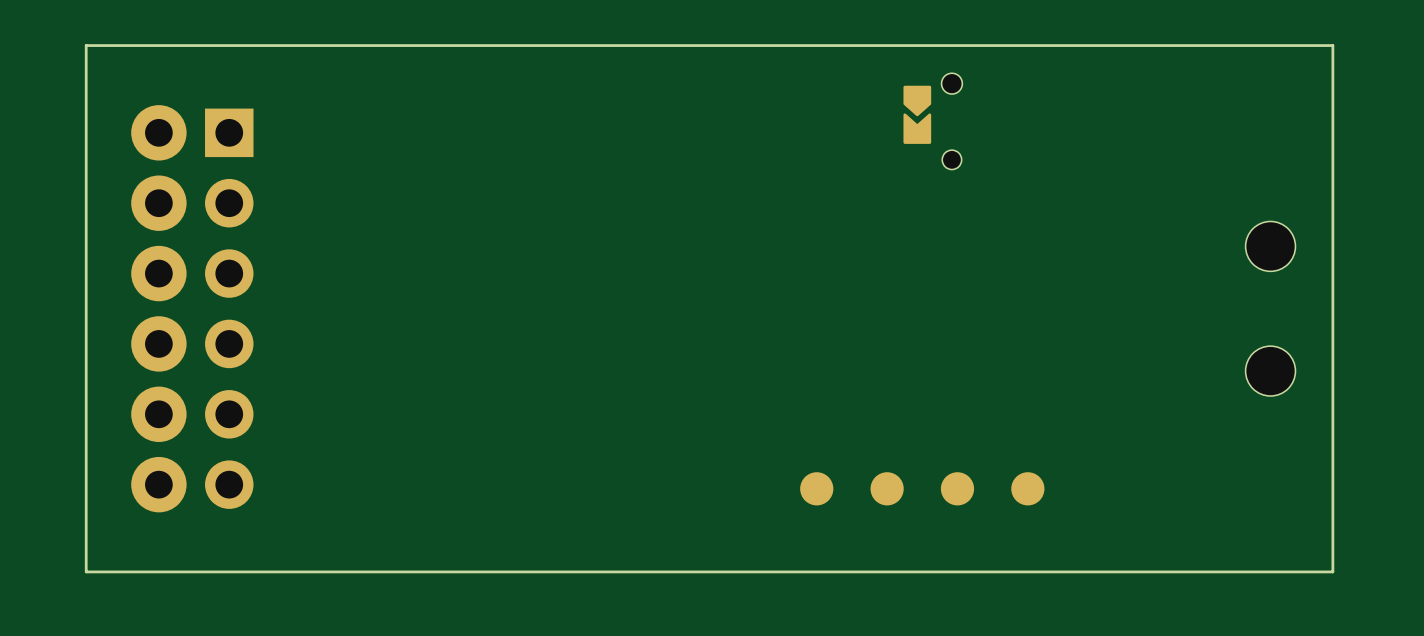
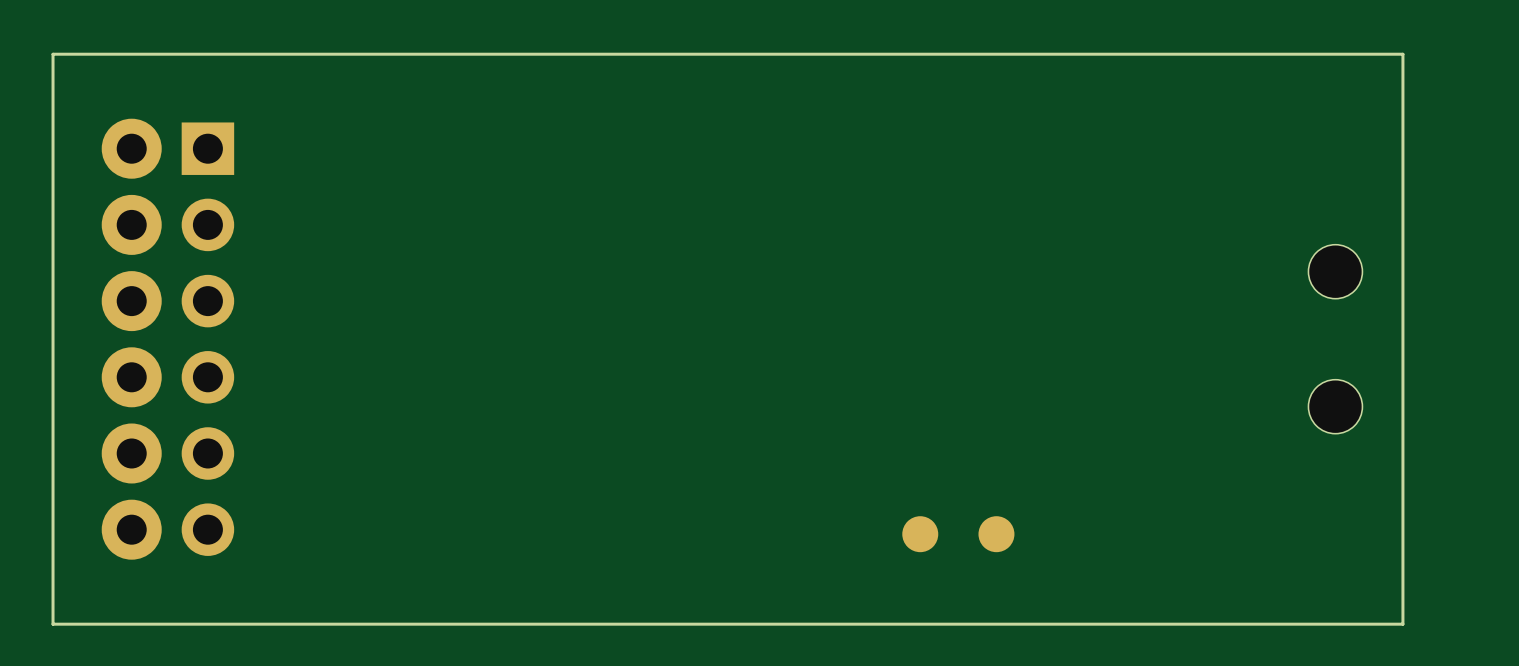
part: (917, 114) -> none
part: (951, 121) -> none
part: (816, 488) -> none
part: (1027, 488) -> none

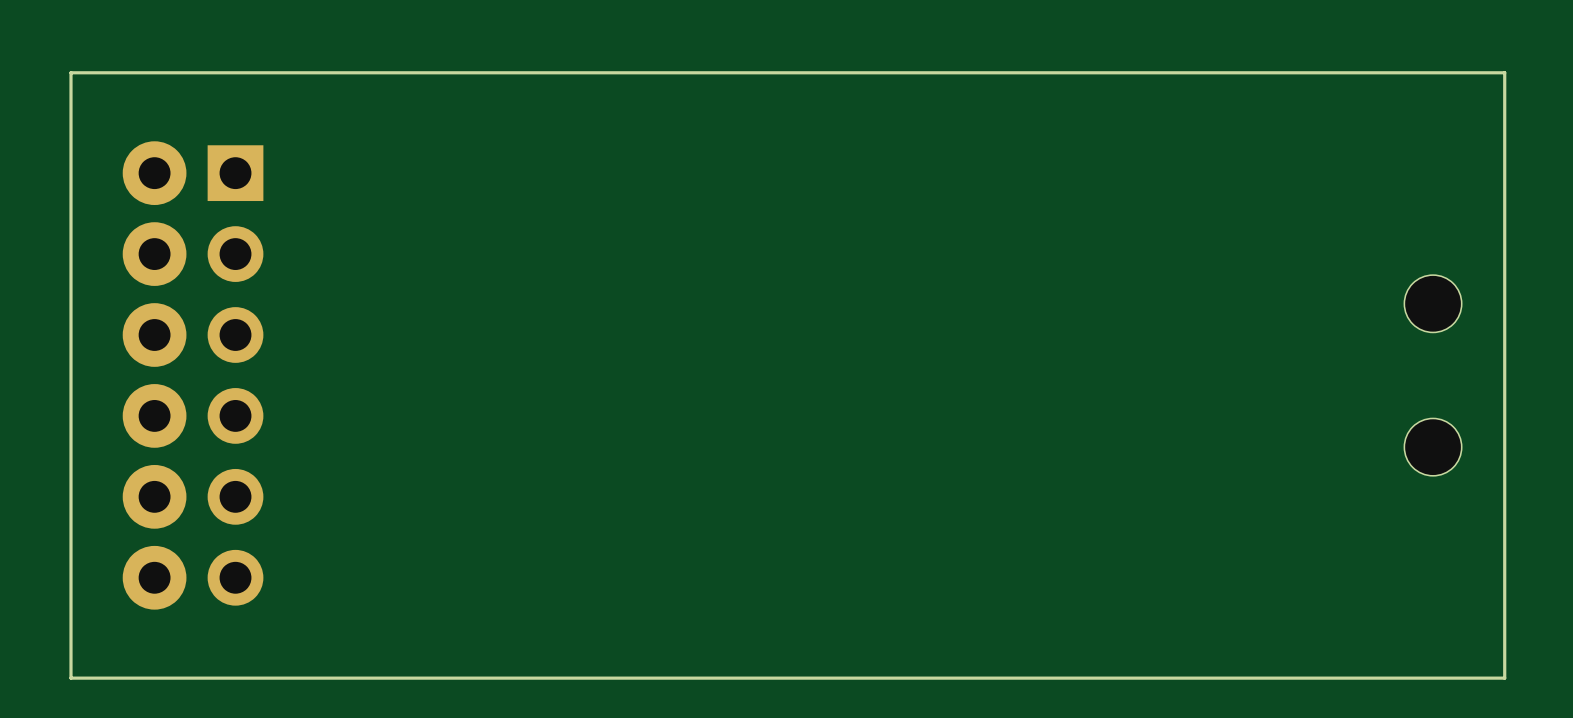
part: (920, 534) -> none
part: (996, 534) -> none

